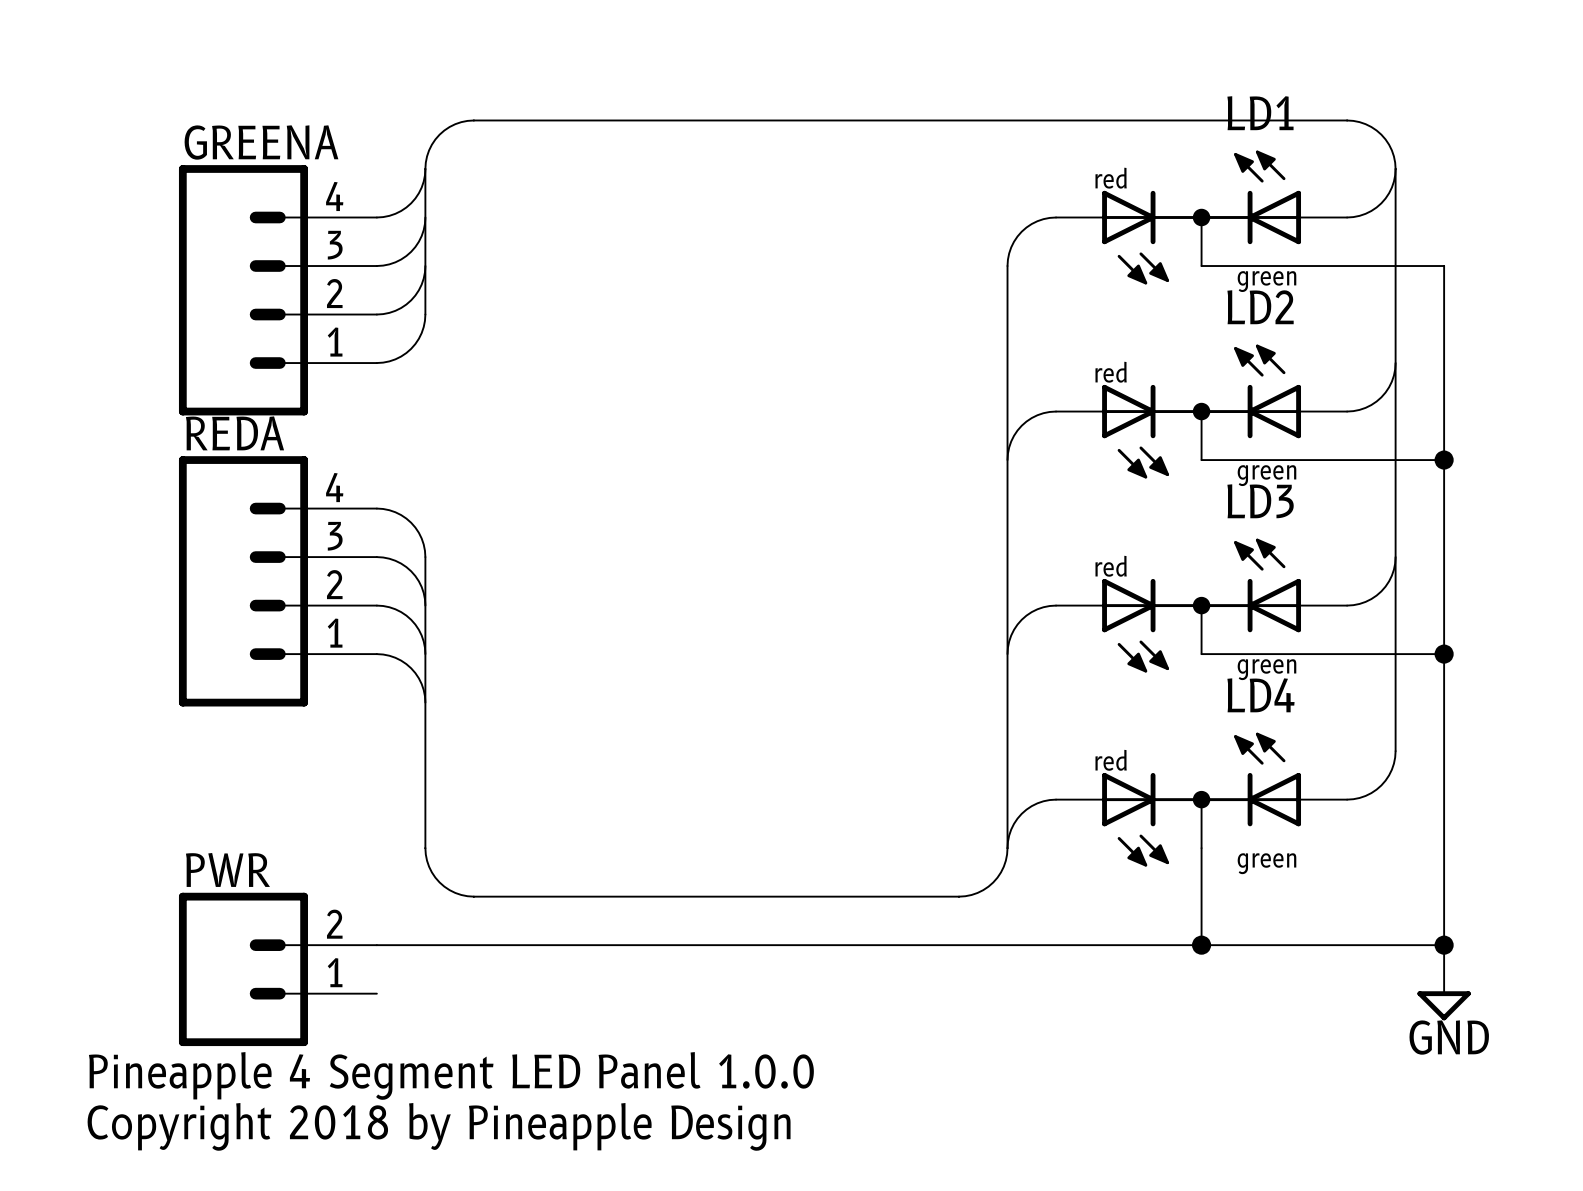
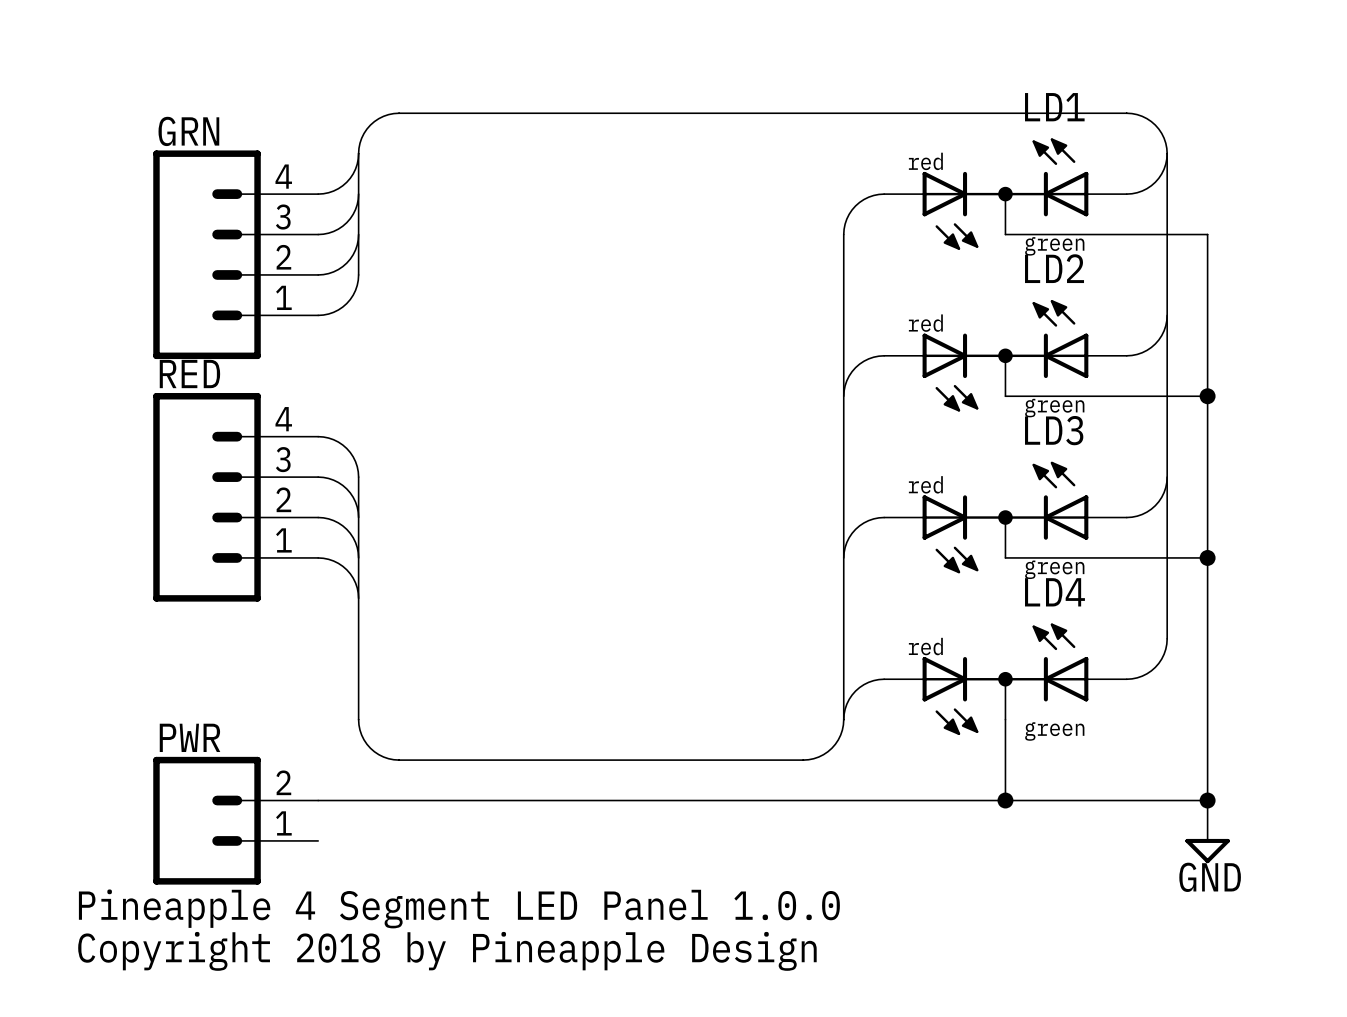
GREENA name: GREENA (261, 142) -> GRN (188, 131)
REDA name: REDA (235, 433) -> RED (189, 374)

